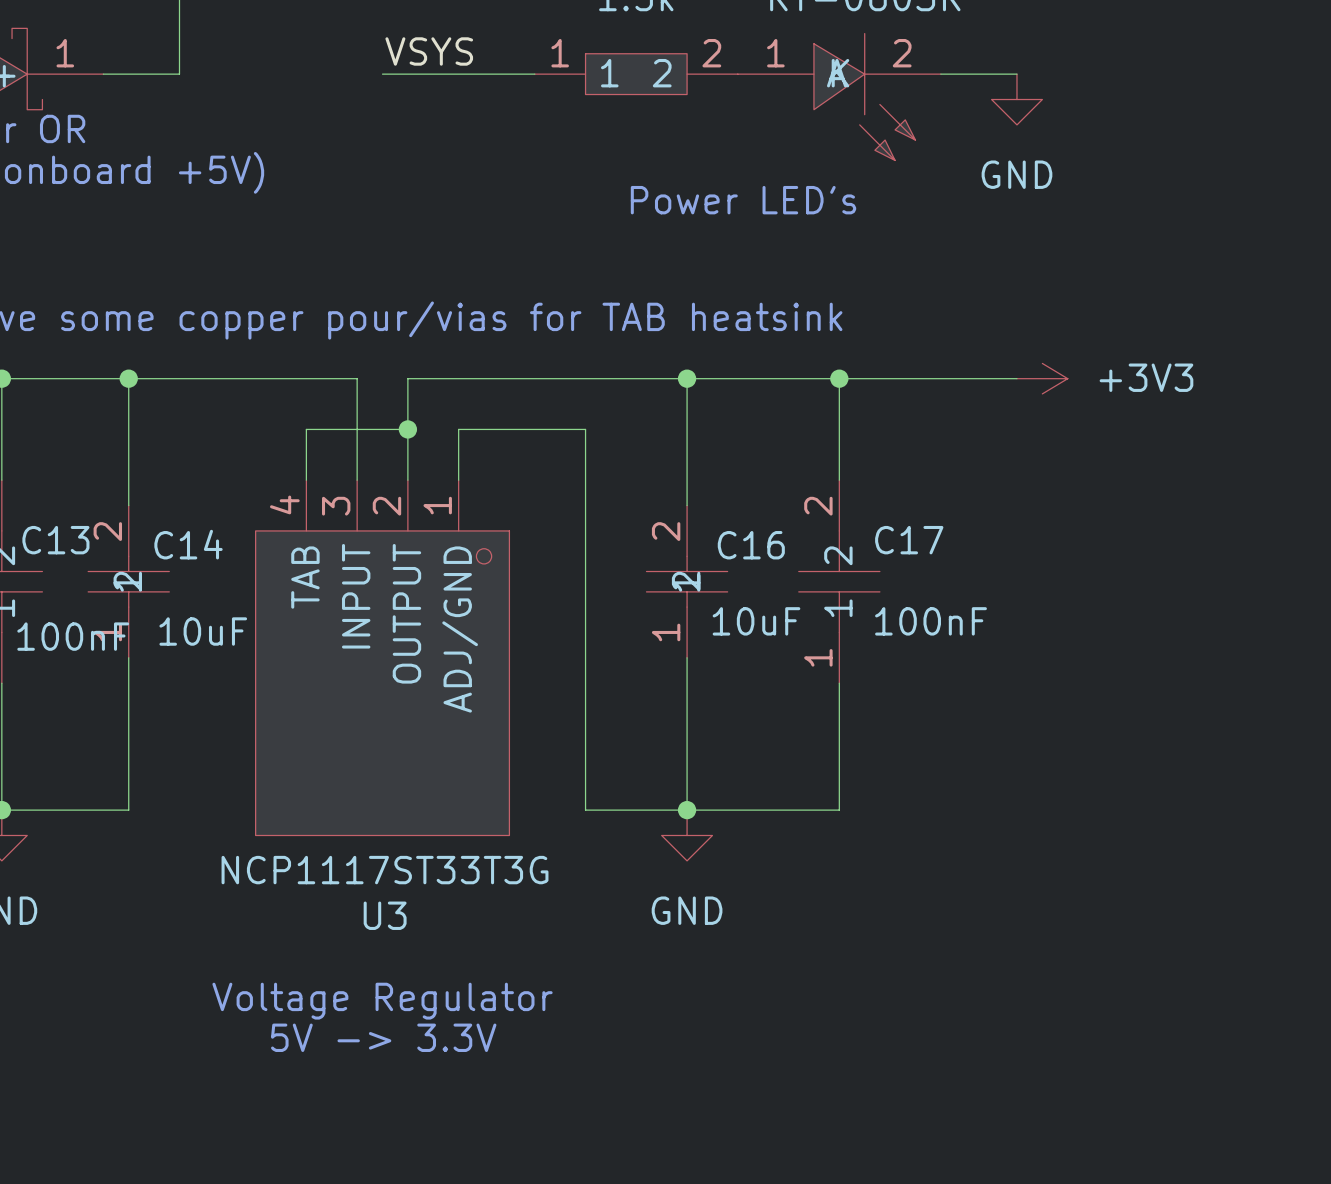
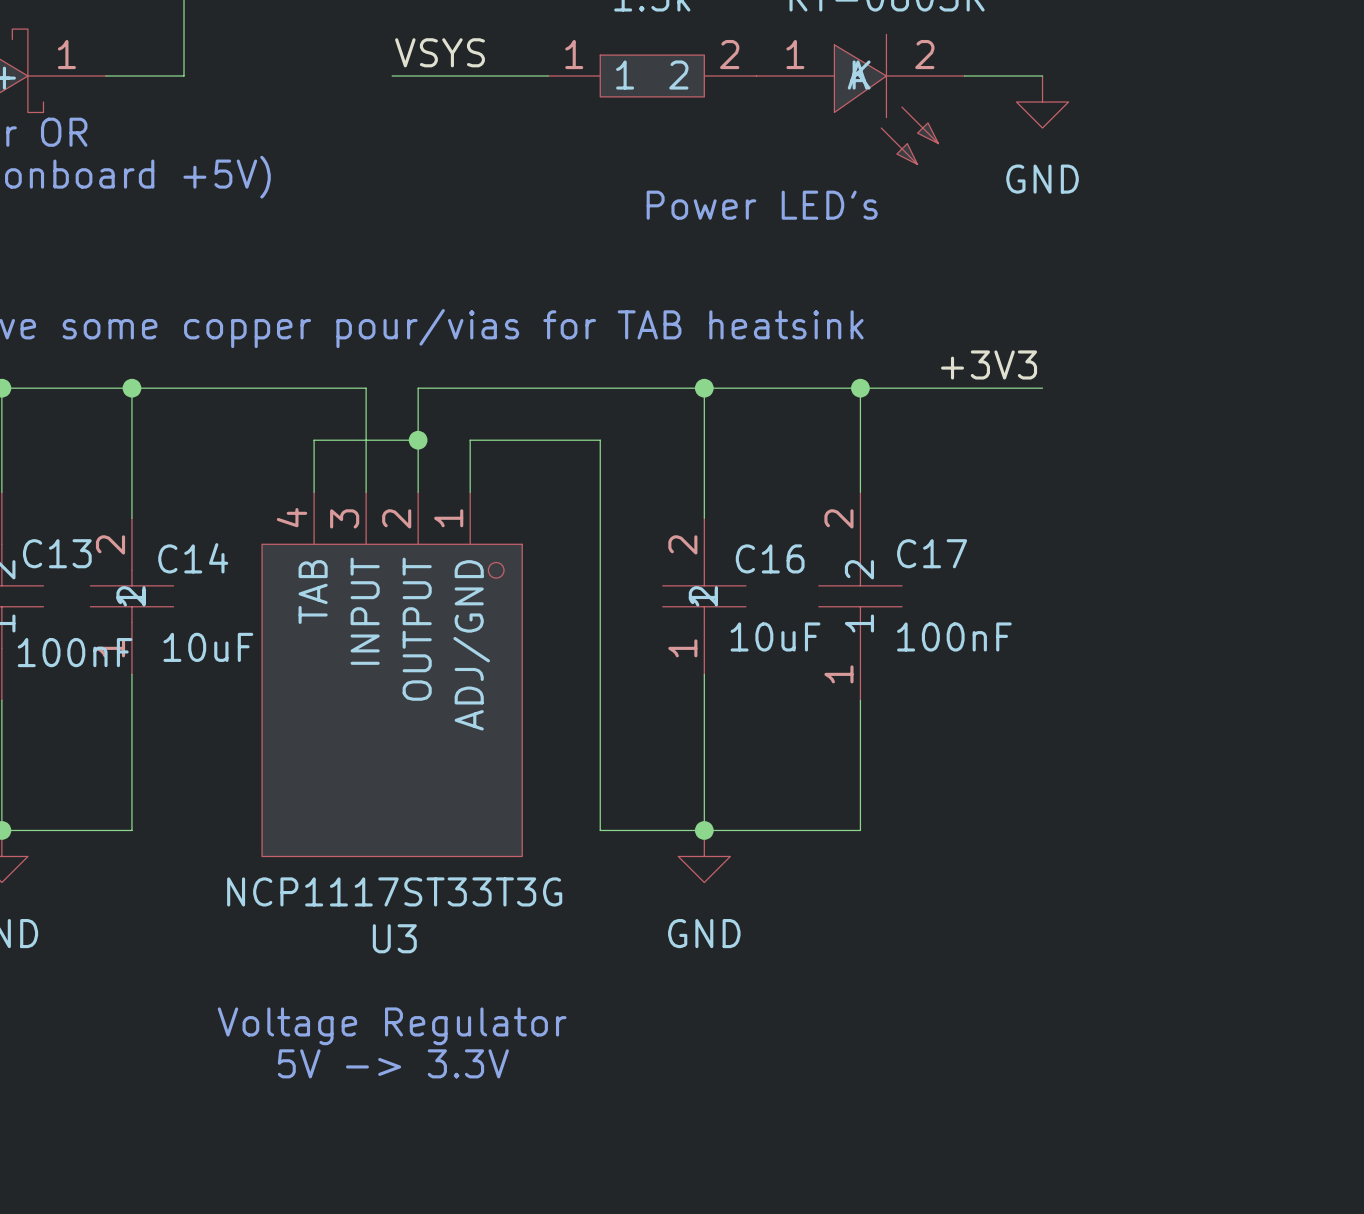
label: none -> +3V3 (989, 364)
power symbol: +3V3 (1042, 378) -> none

